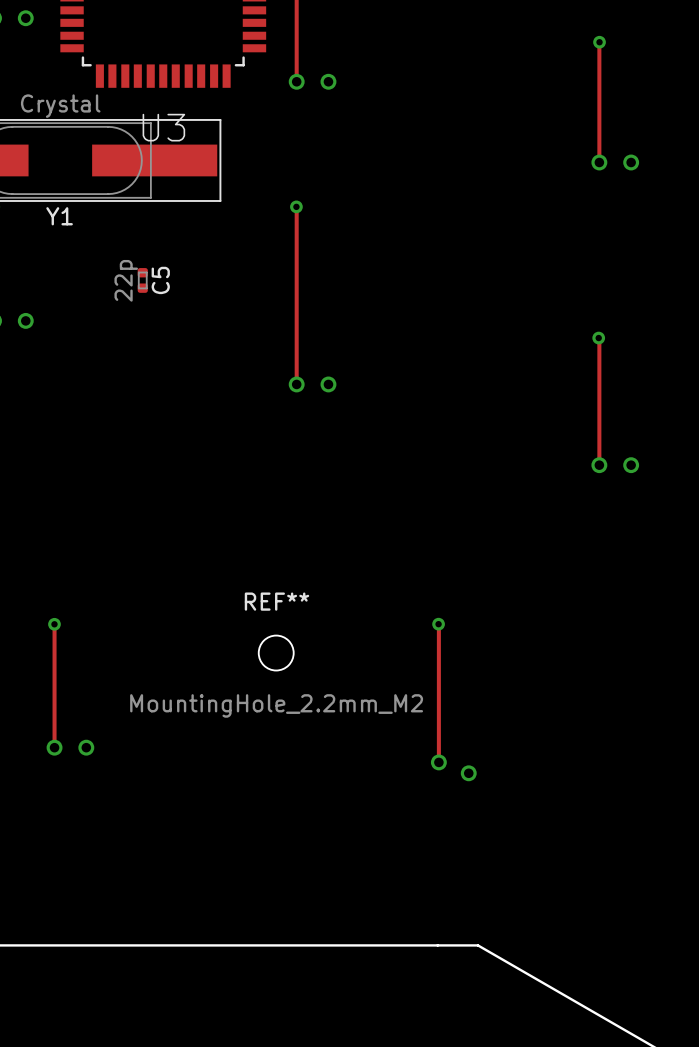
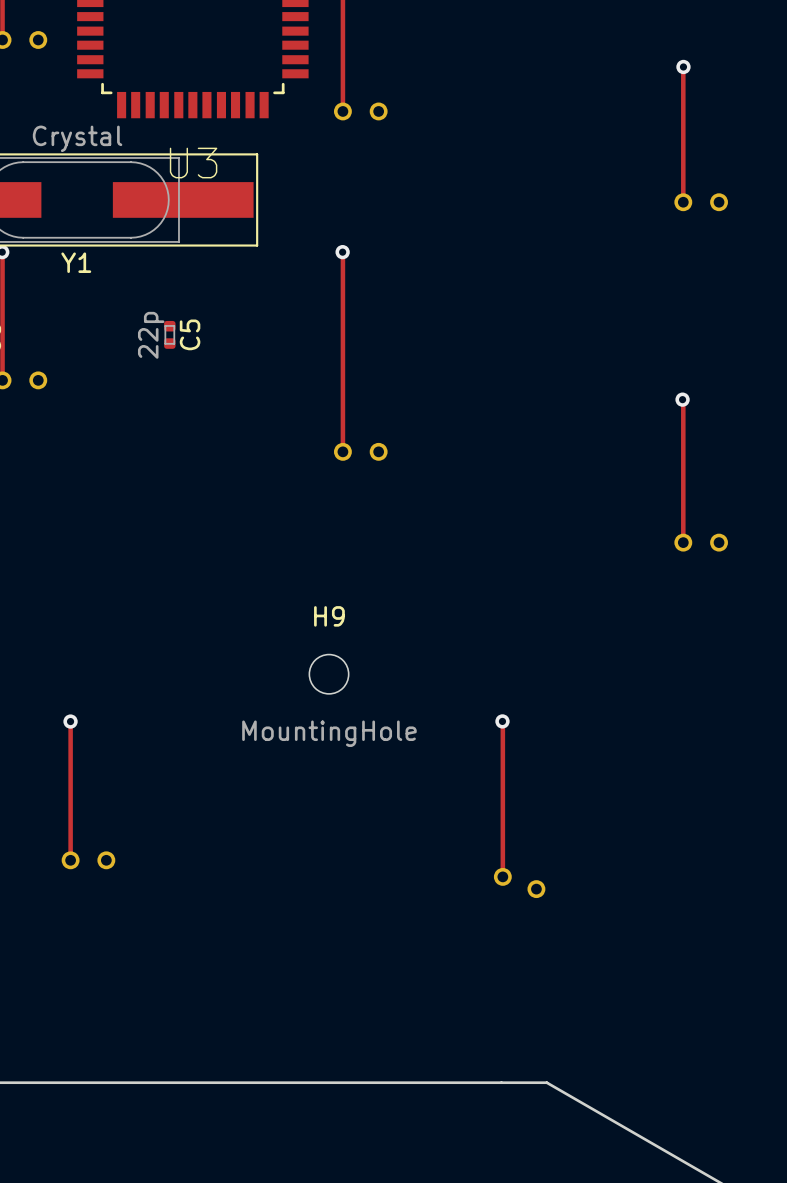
H9: none -> MountingHole (329, 674)
REF**: MountingHole_2.2mm_M2 (276, 653) -> none

